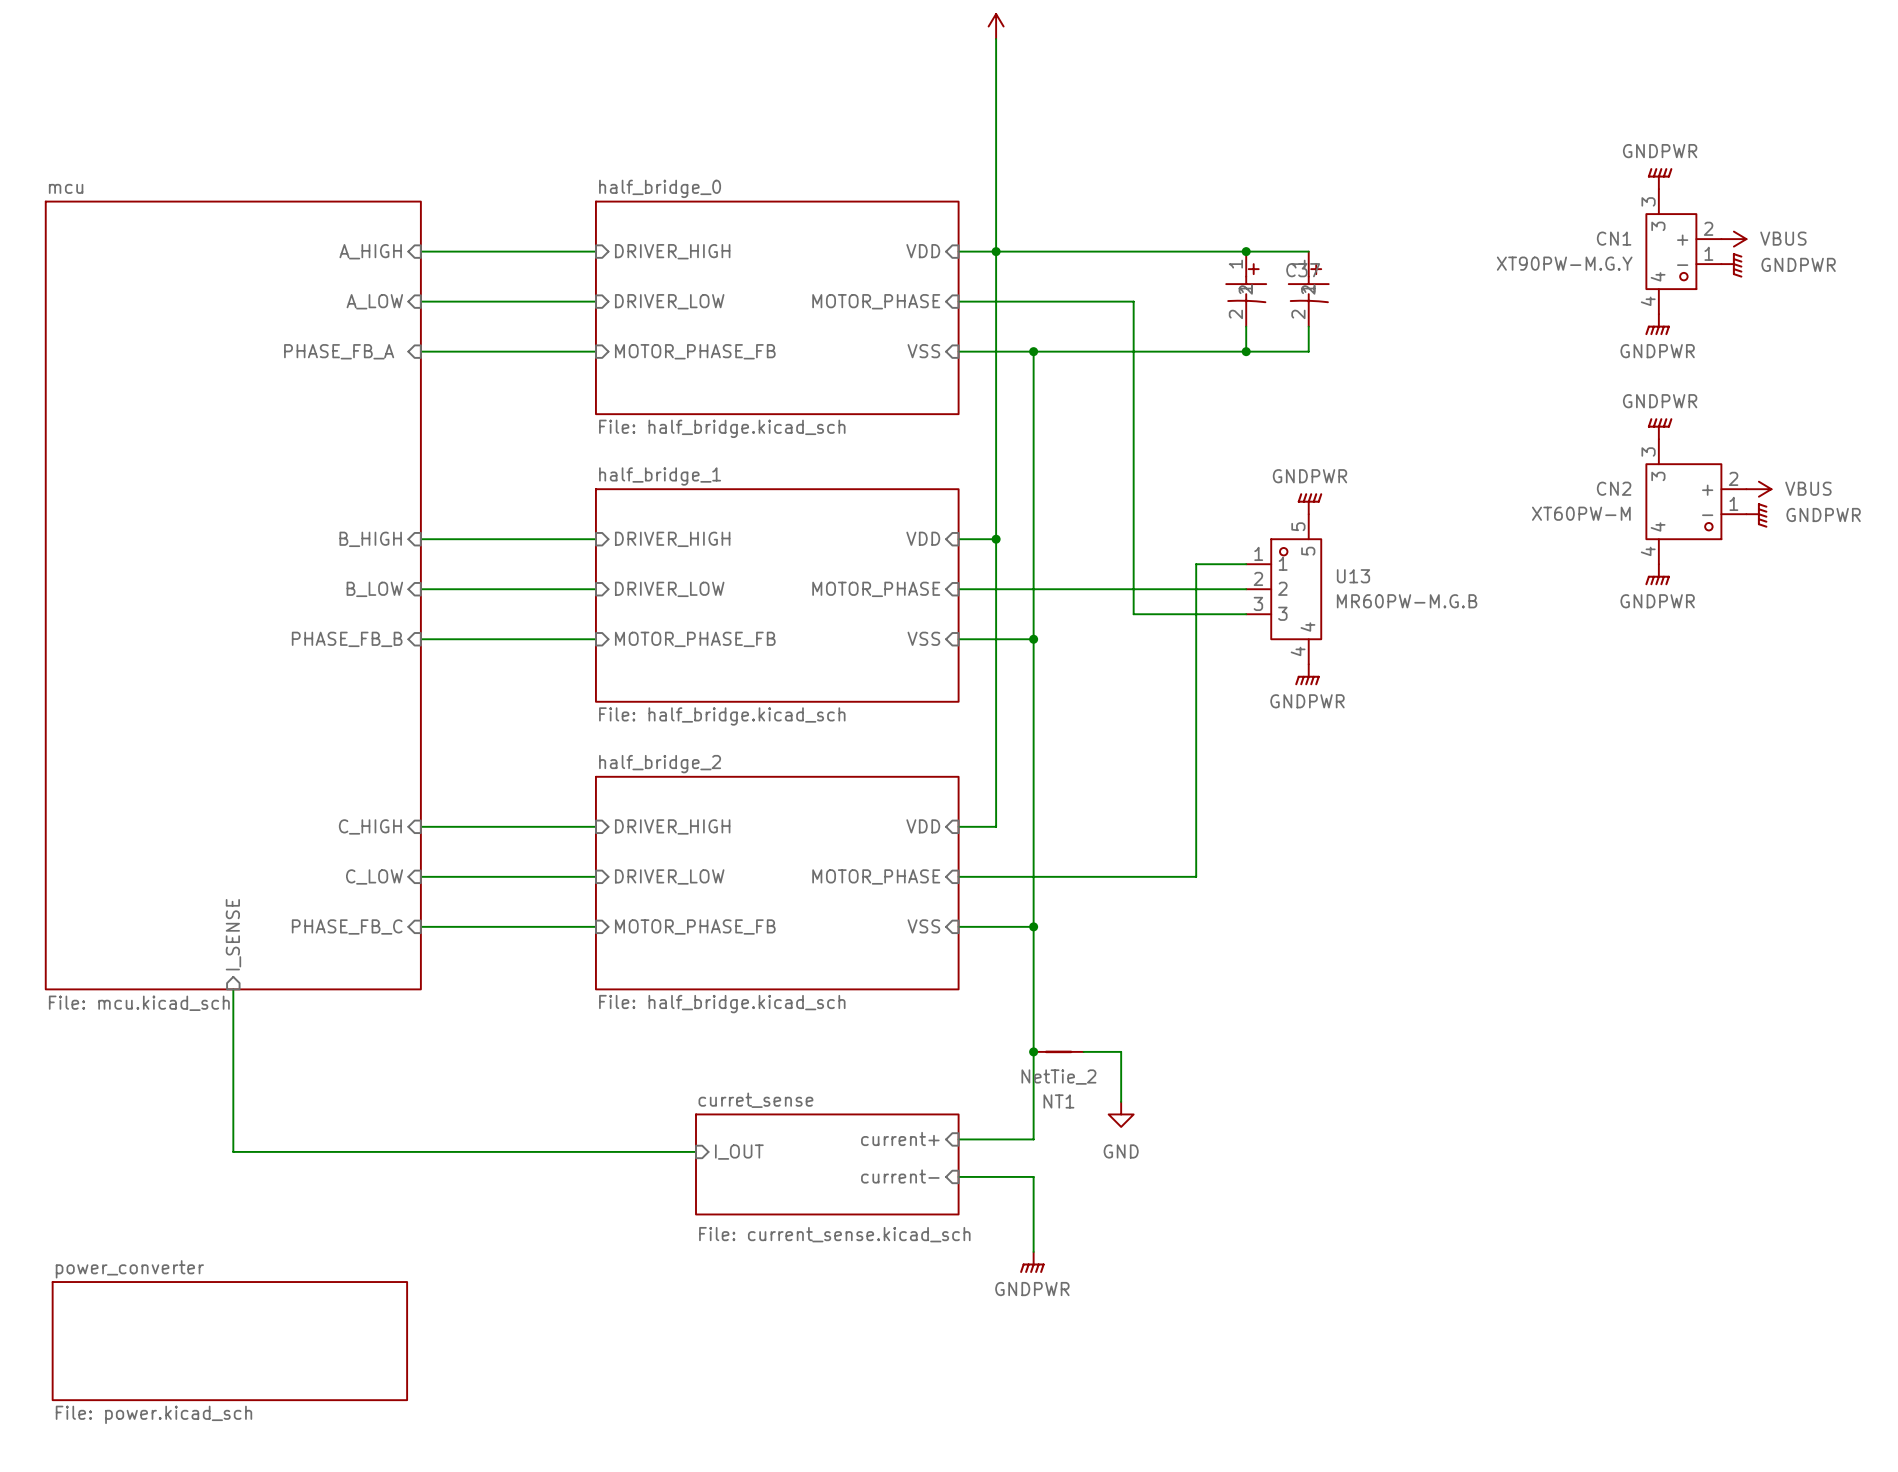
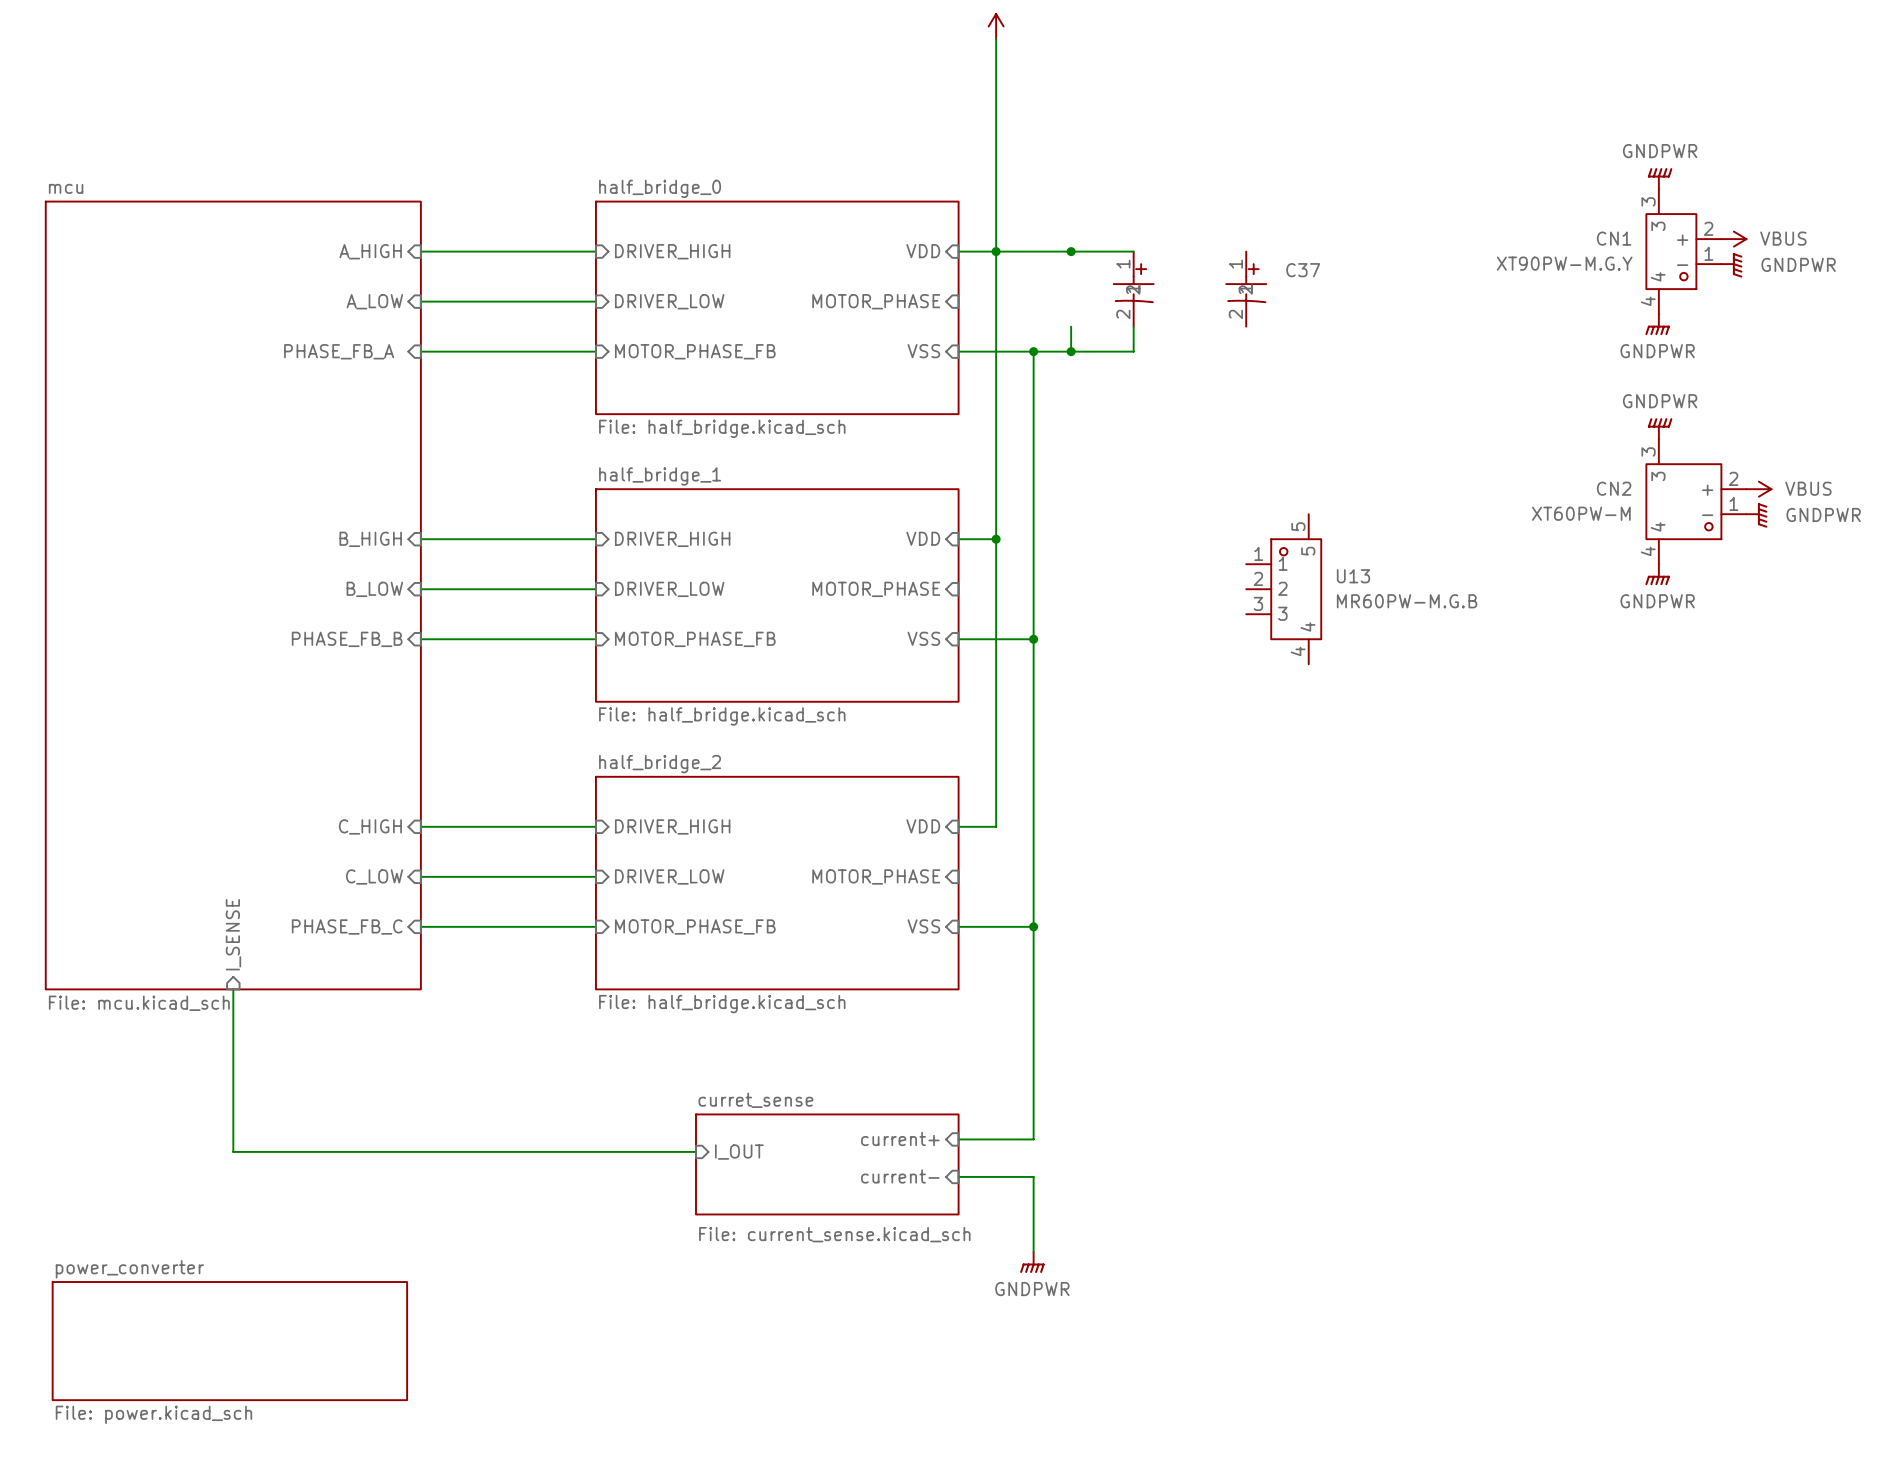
junction: none -> (1071, 251)
wire: (1133, 251) (1308, 251) -> none
junction: (1246, 251) -> none
part position: (1308, 289) -> (1133, 289)
wire: (958, 301) (1133, 301) (1133, 326) -> none
wire: (1246, 326) (1246, 351) -> (1071, 326) (1071, 351)
wire: (1308, 326) (1308, 351) (1133, 351) (1133, 614) (1246, 614) -> none
junction: none -> (1071, 351)
junction: (1246, 351) -> none
power symbol: GNDPWR (1309, 503) -> none
wire: (1246, 564) (1196, 564) (1196, 876) (958, 876) -> none
wire: (958, 589) (1246, 589) -> none
power symbol: GNDPWR (1307, 674) -> none
junction: (1033, 1051) -> none
NT1: NetTie_2 (1058, 1051) -> none
wire: (1083, 1051) (1121, 1051) (1121, 1101) -> none
power symbol: GND (1121, 1114) -> none

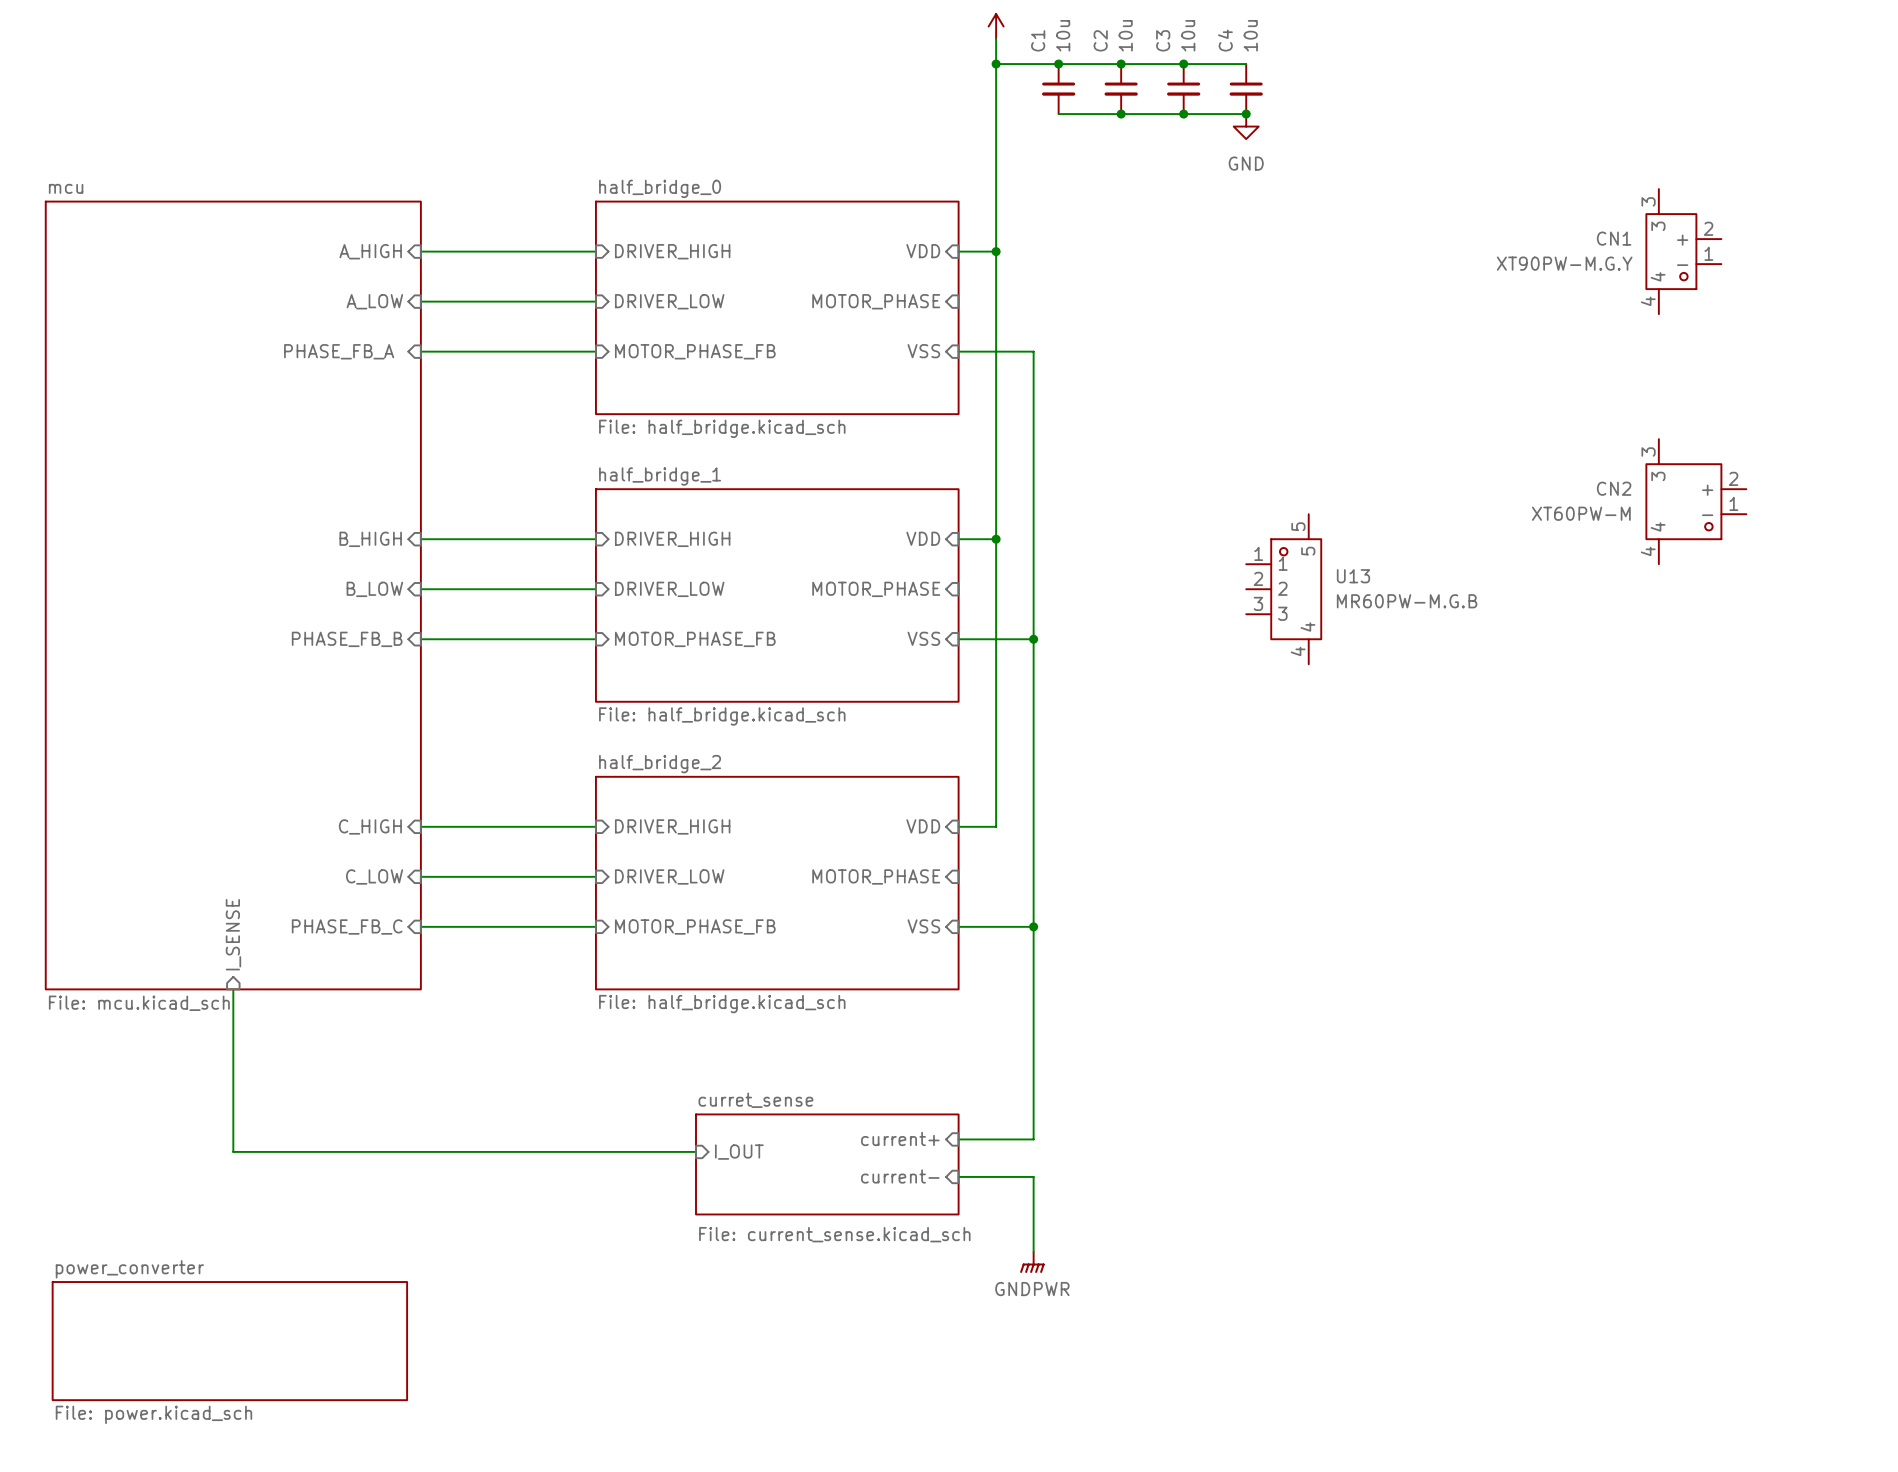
wire: none -> (996, 64) (1246, 64)
junction: none -> (996, 64)
junction: none -> (1058, 64)
junction: none -> (1121, 64)
junction: none -> (1183, 64)
C1: none -> 10u (1058, 89)
C2: none -> 10u (1121, 89)
C3: none -> 10u (1183, 89)
C4: none -> 10u (1246, 89)
wire: none -> (1058, 114) (1246, 114)
junction: none -> (1121, 114)
junction: none -> (1183, 114)
junction: none -> (1246, 114)
power symbol: none -> GND (1246, 126)
power symbol: GNDPWR (1660, 178) -> none
power symbol: VBUS (1733, 239) -> none
wire: (996, 251) (1133, 251) -> none
junction: (1071, 251) -> none
power symbol: GNDPWR (1731, 265) -> none
part: (1133, 289) -> none
C37: (1246, 289) -> none
power symbol: GNDPWR (1657, 324) -> none
wire: (1071, 326) (1071, 351) -> none
wire: (1133, 326) (1133, 351) (1033, 351) -> none
junction: (1033, 351) -> none
junction: (1071, 351) -> none
power symbol: GNDPWR (1660, 428) -> none
power symbol: VBUS (1758, 489) -> none
power symbol: GNDPWR (1756, 515) -> none
power symbol: GNDPWR (1657, 574) -> none

